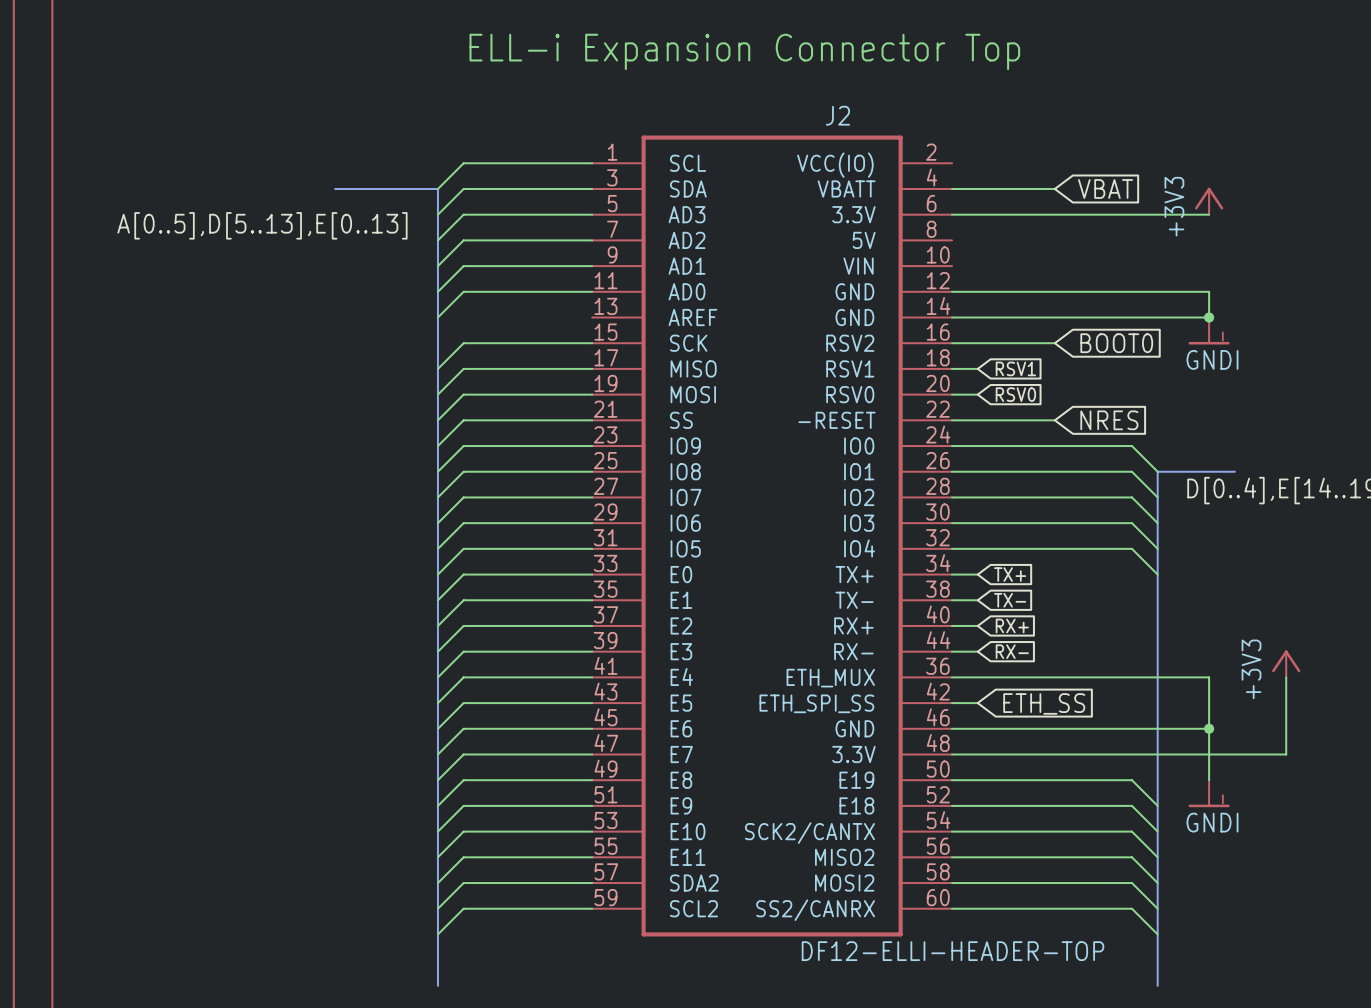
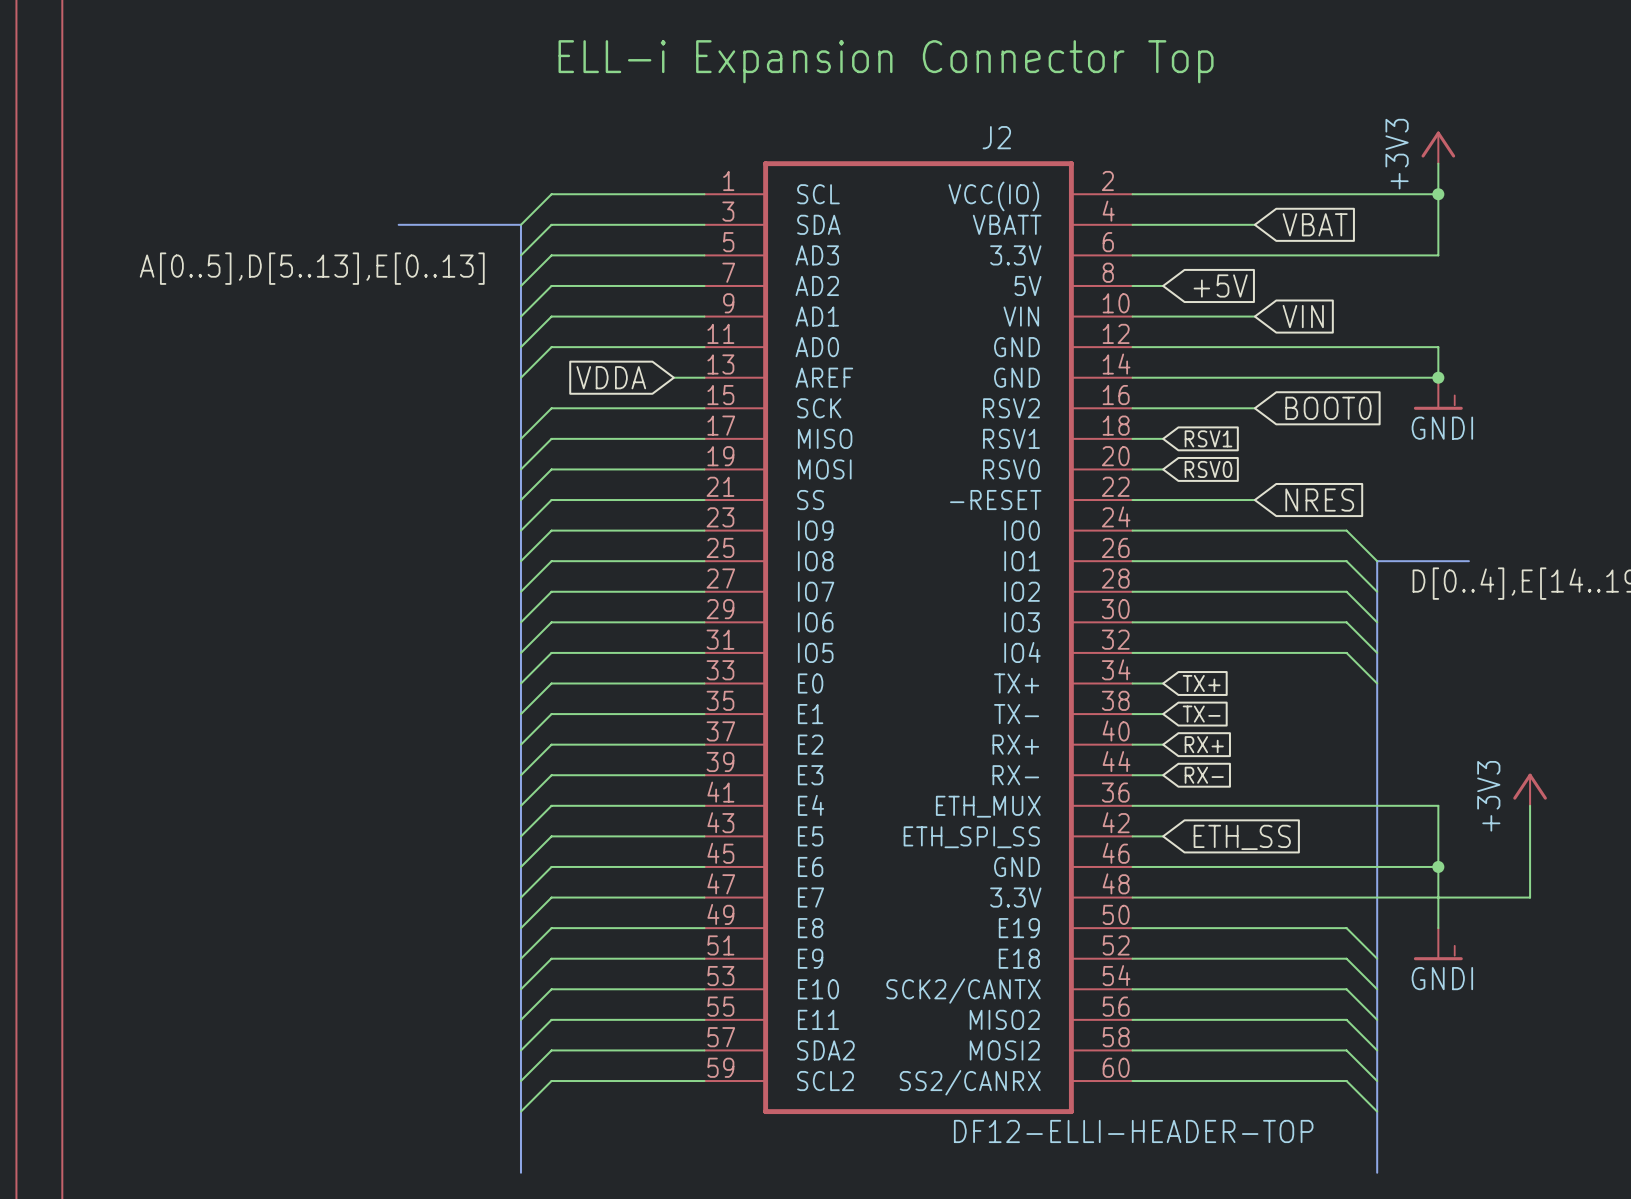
wire: none -> (1438, 163) (1438, 255)
wire: none -> (1132, 194) (1438, 194)
junction: none -> (1438, 194)
power symbol position: +3V3 (1209, 201) -> +3V3 (1438, 147)
wire: none -> (1132, 285) (1163, 285)
global label: none -> +5V (1220, 285)
wire: none -> (1132, 316) (1254, 316)
global label: none -> VIN (1303, 316)
global label: none -> VDDA (611, 377)
wire: none -> (673, 377) (704, 377)

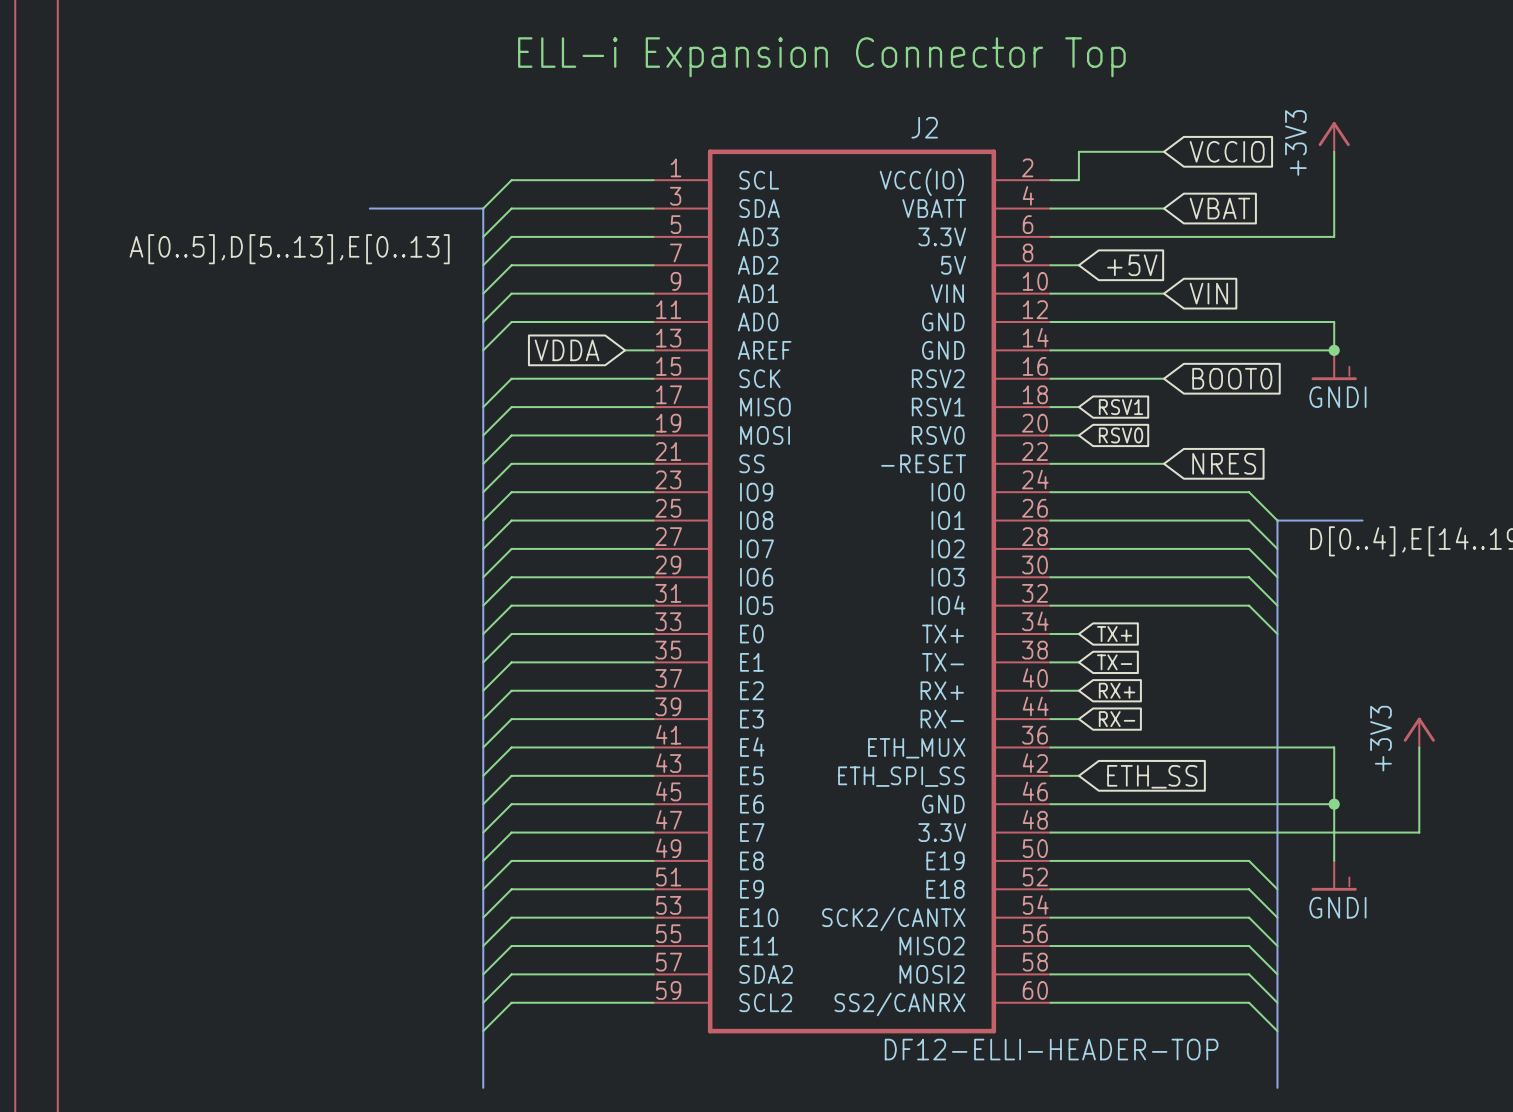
global label: none -> VCCIO (1227, 151)
wire: (1163, 194) (1438, 194) -> (1078, 180) (1078, 151) (1164, 151)
junction: (1438, 194) -> none

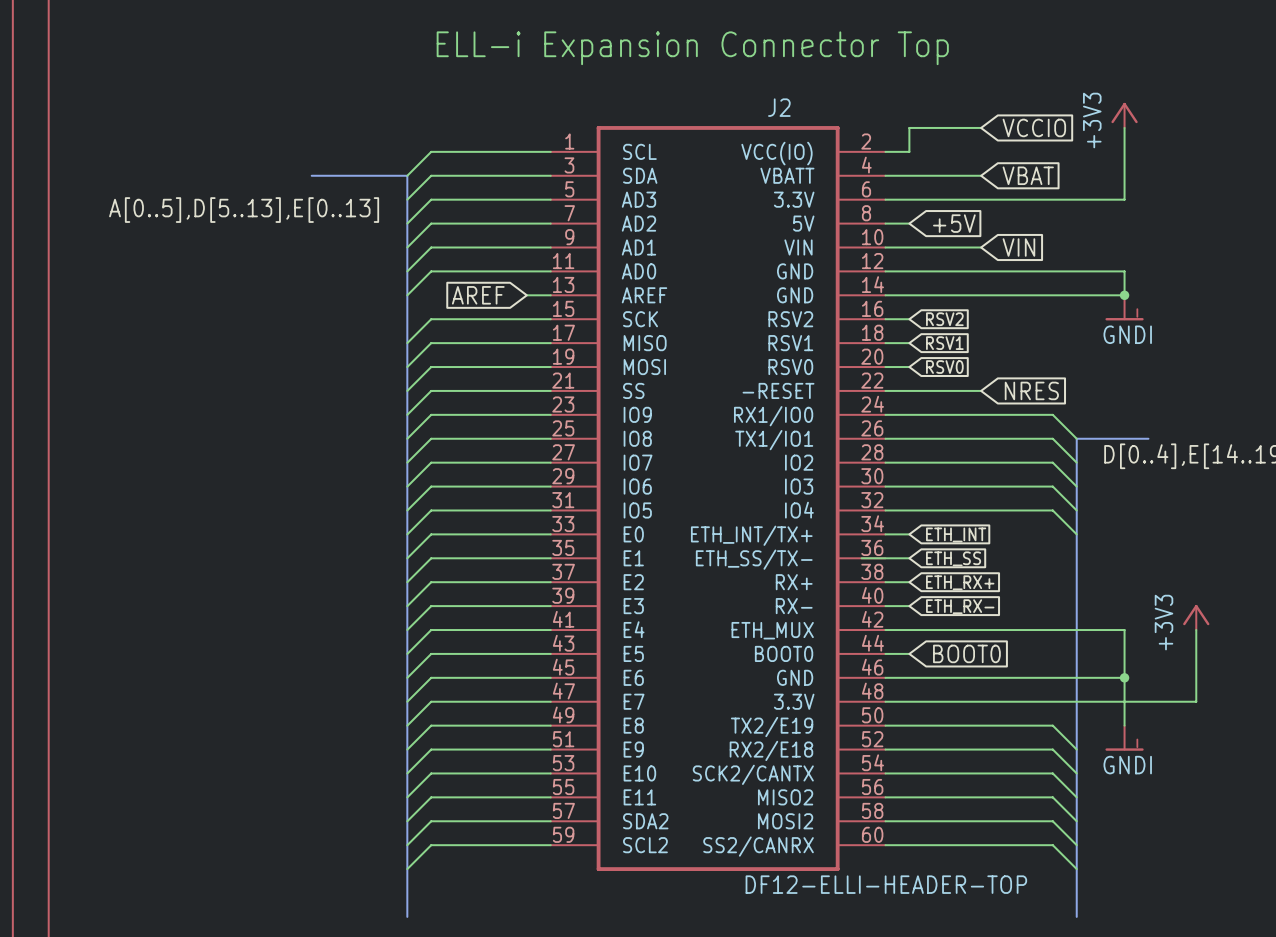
J2 symbol: [653, 149, 1051, 1034] -> [550, 126, 886, 872]
global label: VDDA (567, 350) -> AREF (478, 295)
wire: (1078, 378) (1164, 378) -> none
global label: none -> RSV2 (944, 319)
global label: BOOT0 (1232, 378) -> none
global label: TX+ (1114, 634) -> ETH_INT (956, 534)
global label: TX- (1114, 662) -> ETH_SS (953, 558)
global label: RX+ (1117, 690) -> ETH_RX+ (960, 582)
global label: RX- (1117, 719) -> ETH_RX- (960, 606)
global label: ETH_SS (1152, 776) -> BOOT0 (966, 653)

